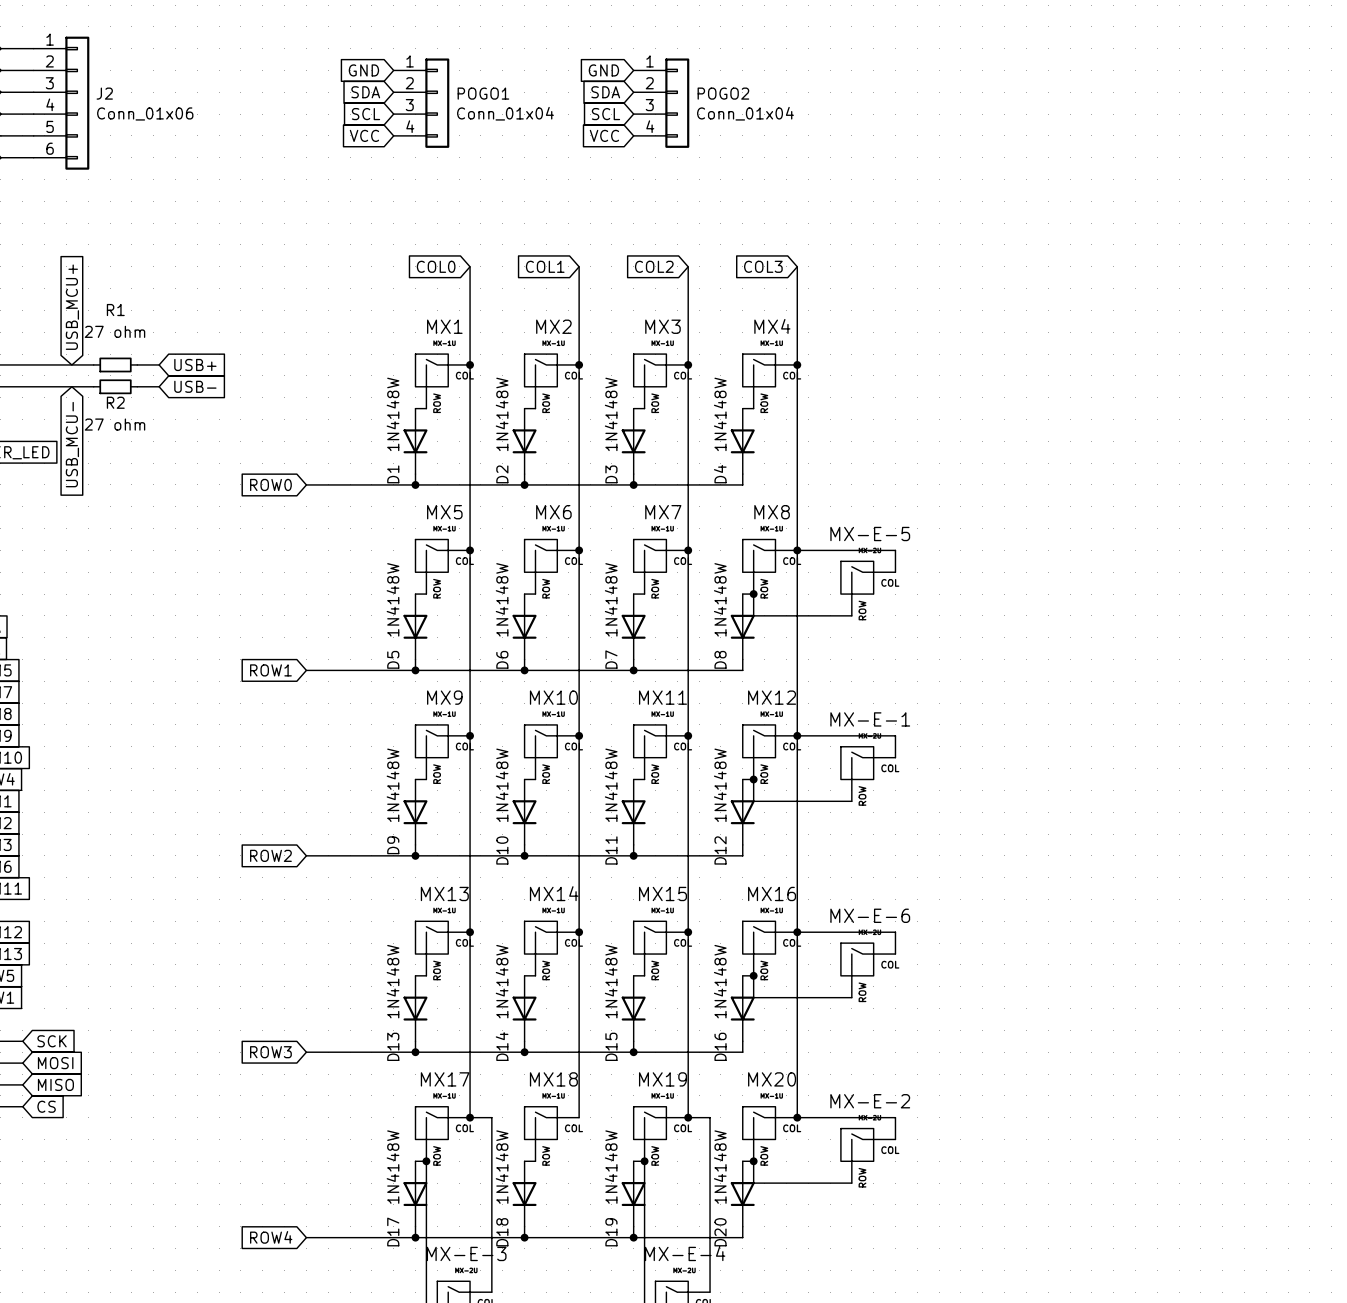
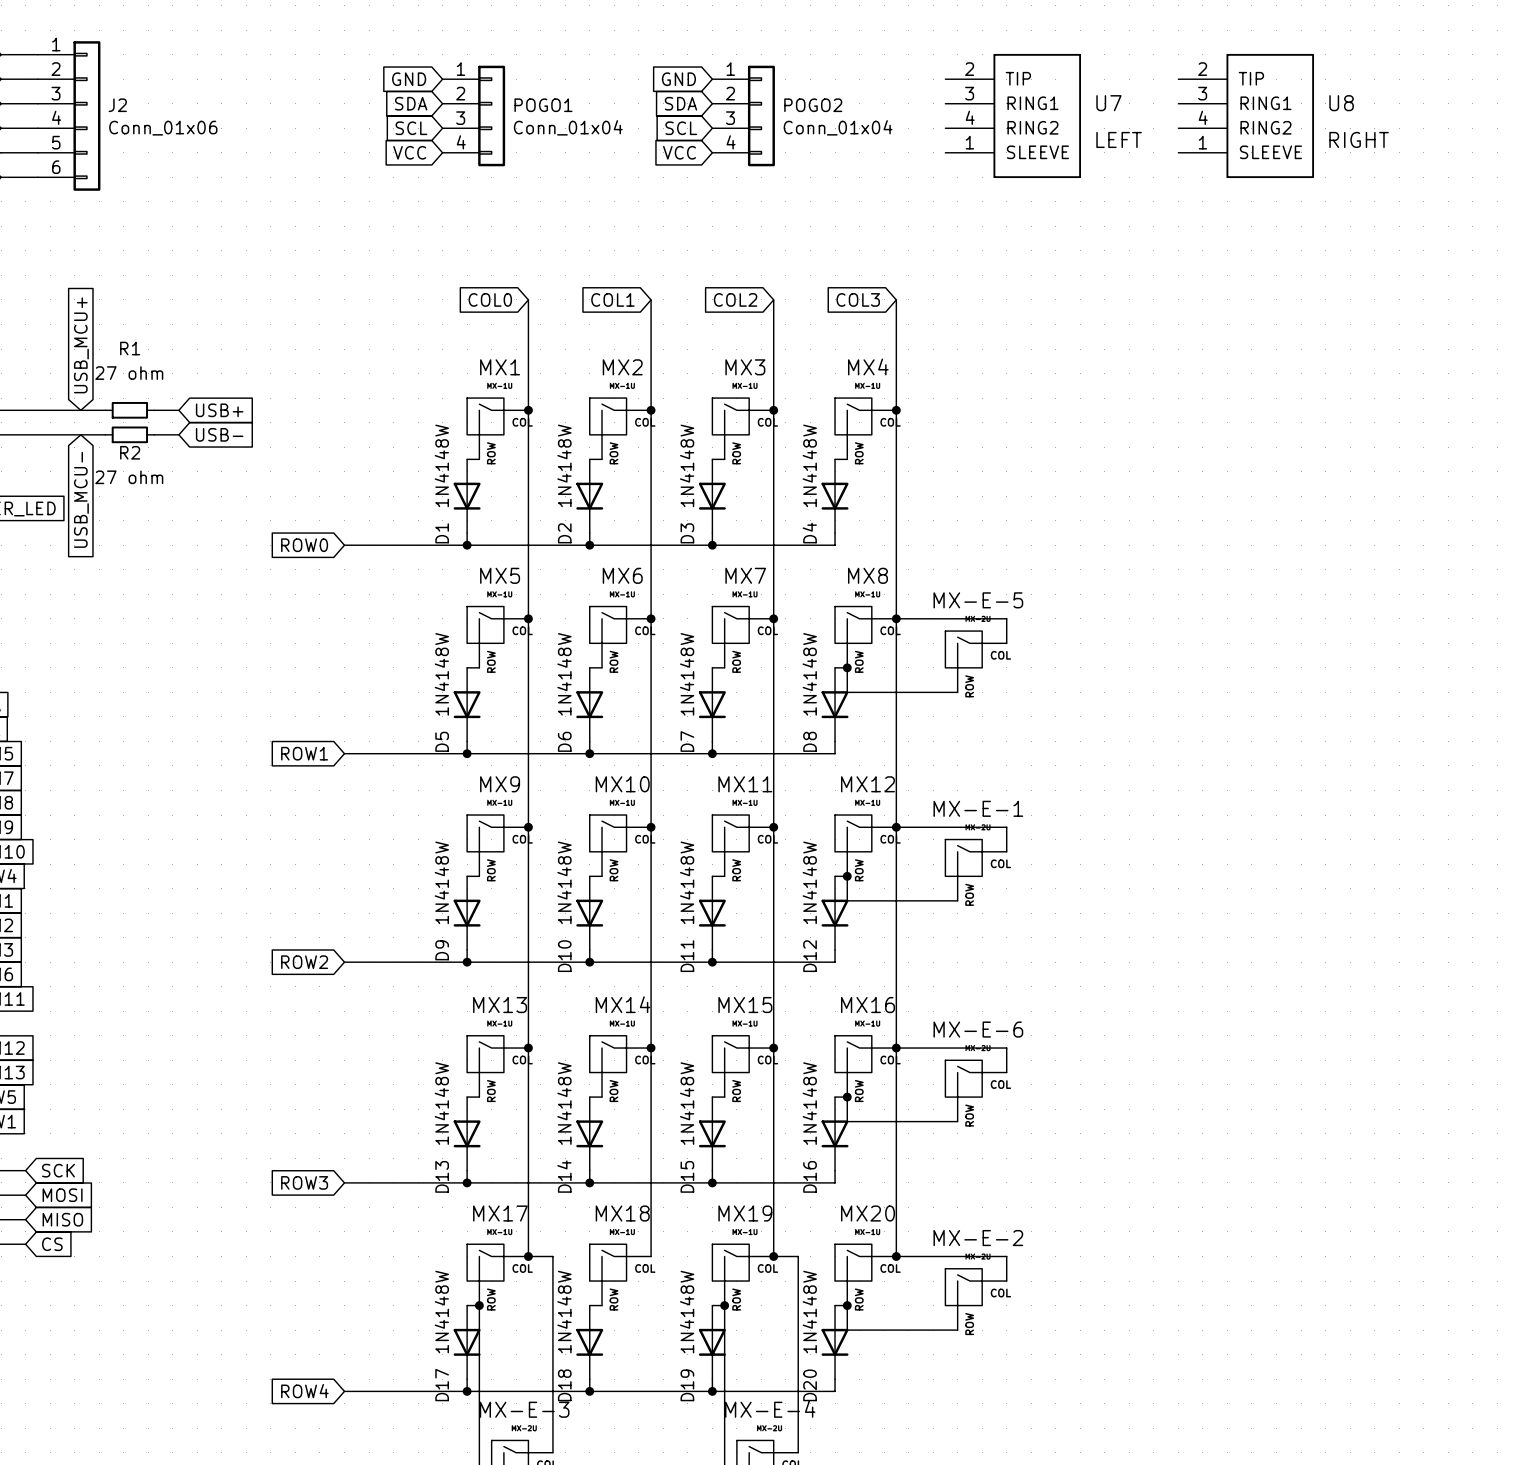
U7: none -> LEFT (1012, 115)
U8: none -> RIGHT (1245, 115)

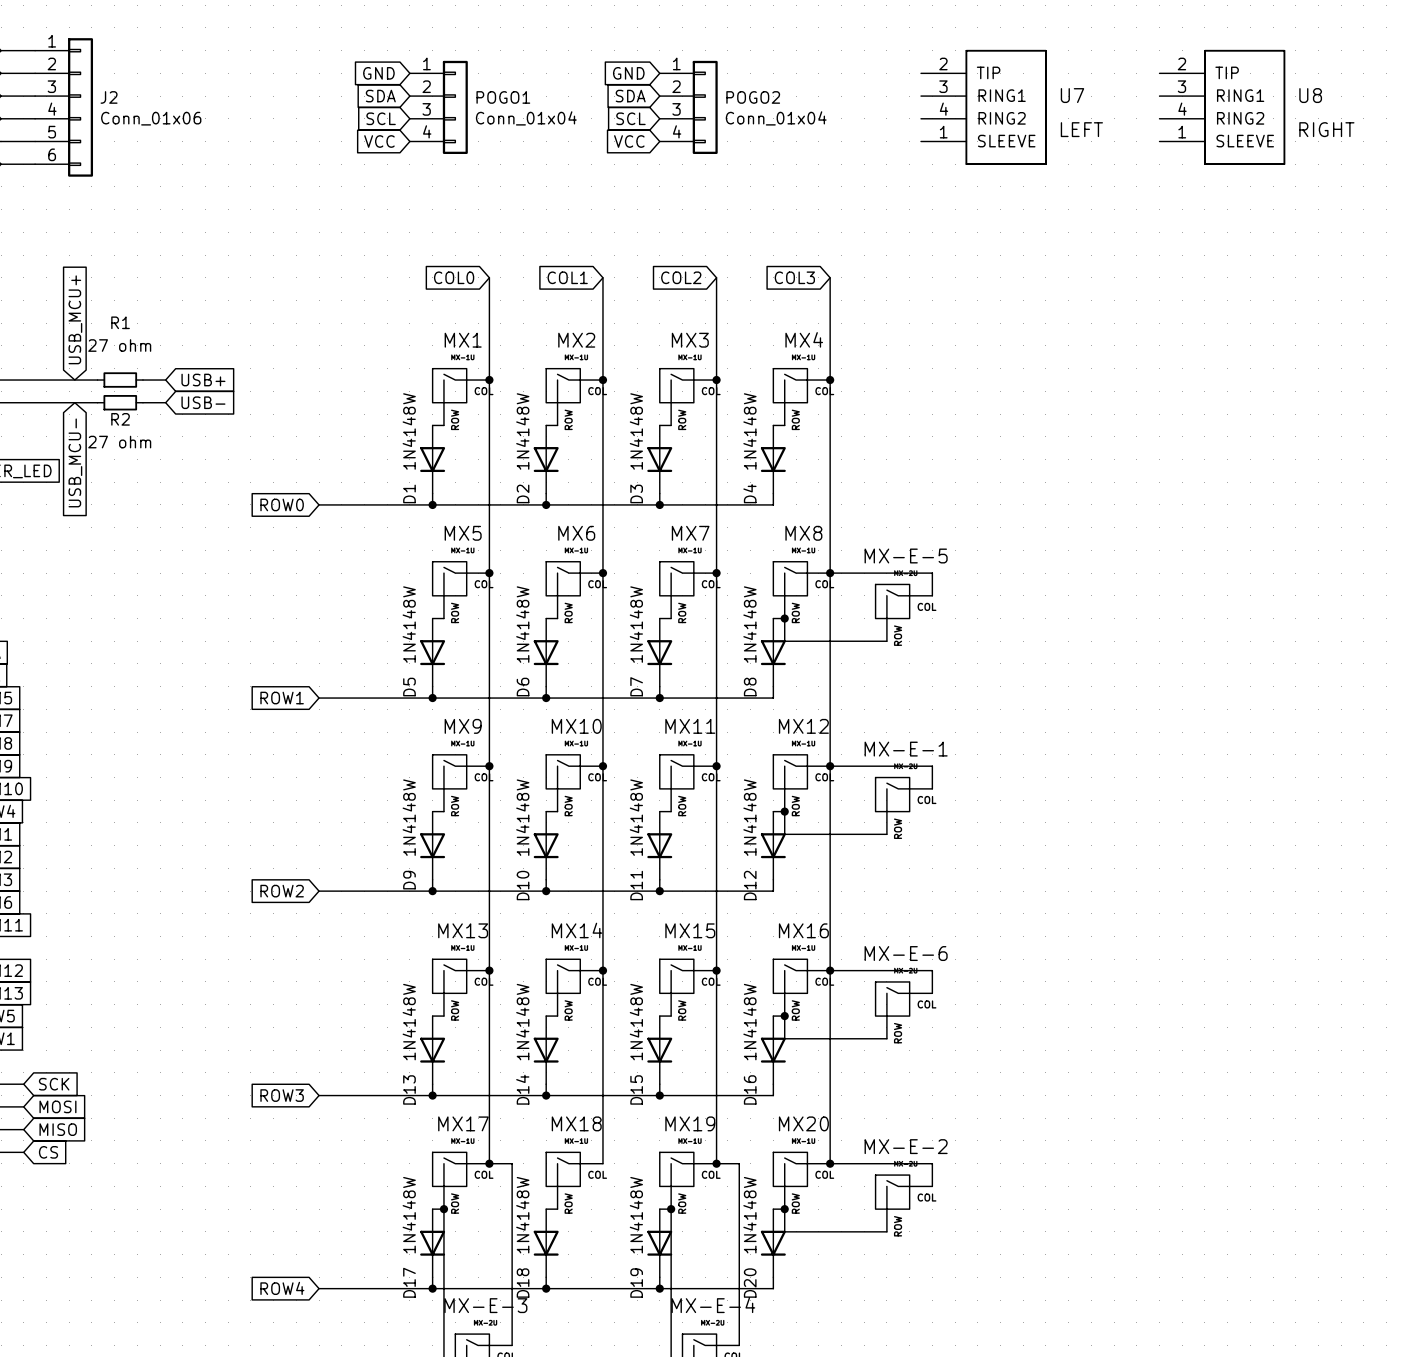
U7 position: (1012, 115) -> (983, 107)
U8 position: (1245, 115) -> (1221, 107)

